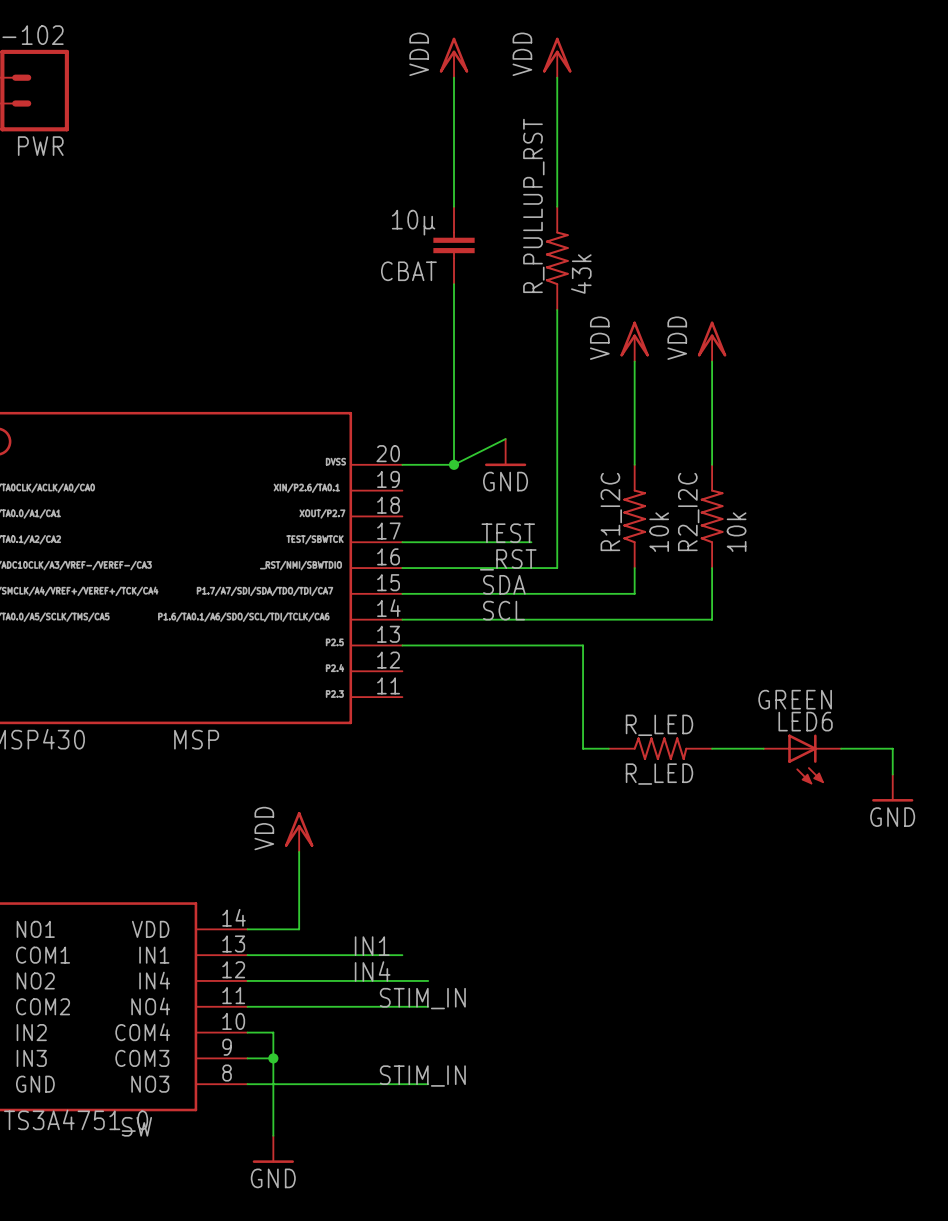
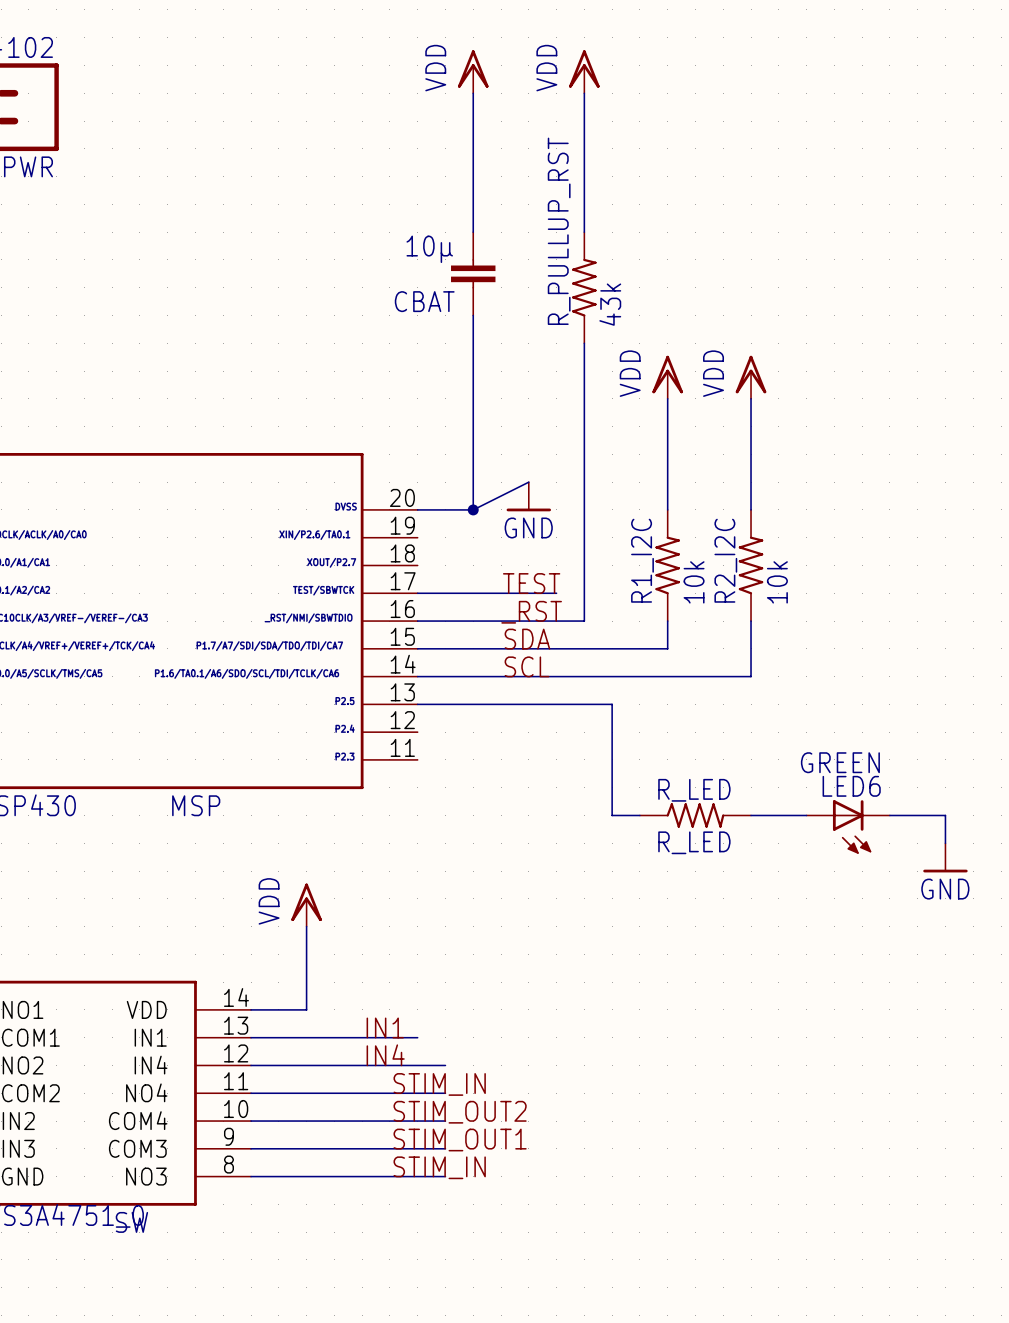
label: none -> STIM_OUT2 (460, 1112)
wire: (273, 1032) (273, 1135) -> (278, 1121) (445, 1121)
label: none -> STIM_OUT1 (460, 1140)
wire: none -> (278, 1148) (445, 1148)
junction: (273, 1058) -> none
power symbol: GND (273, 1149) -> none

